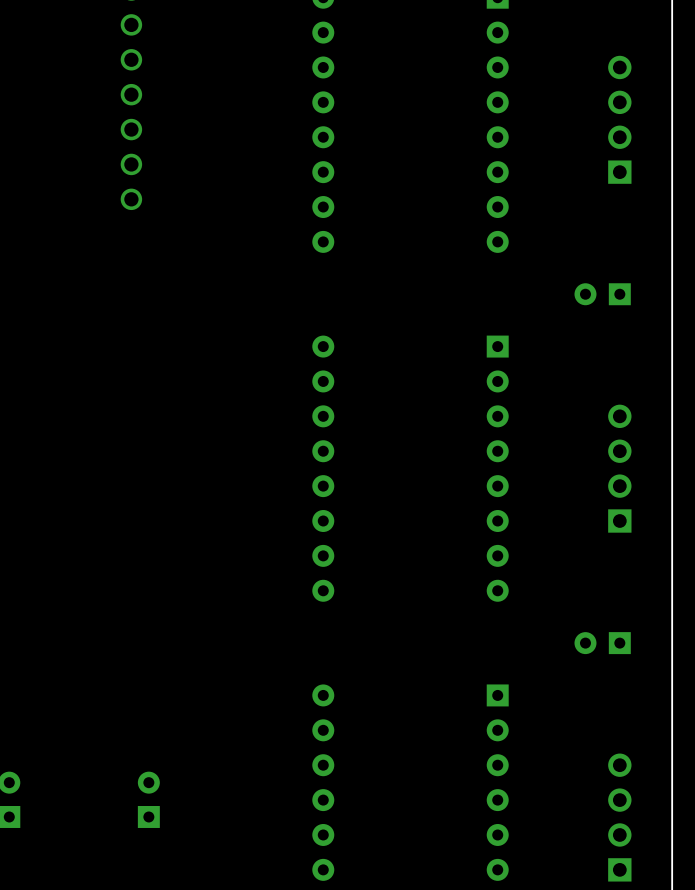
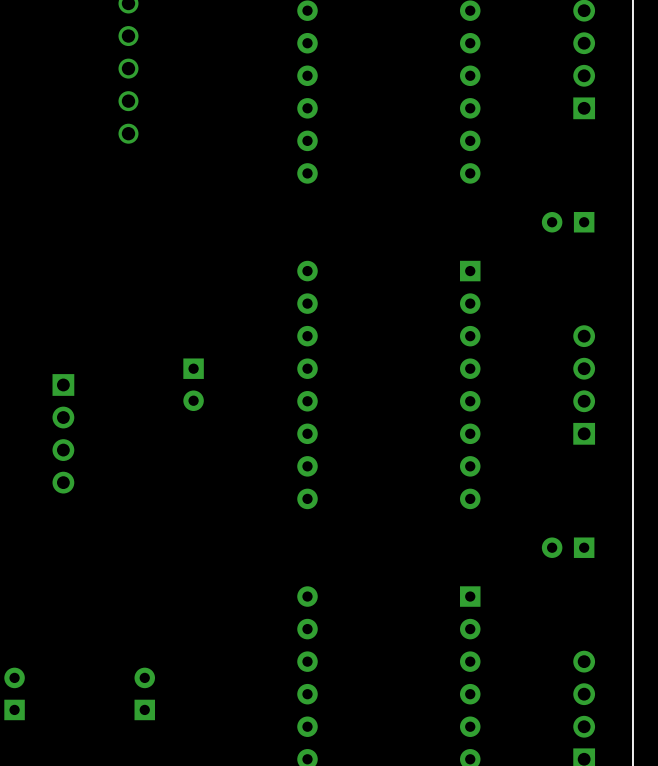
part: none -> (193, 384)
part: none -> (63, 433)

